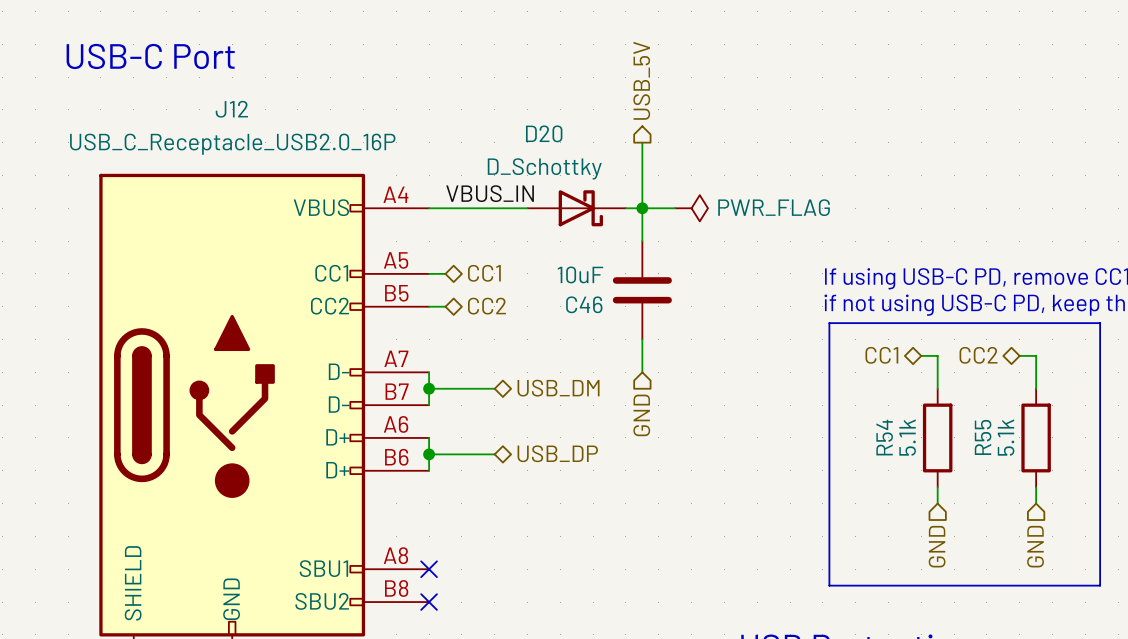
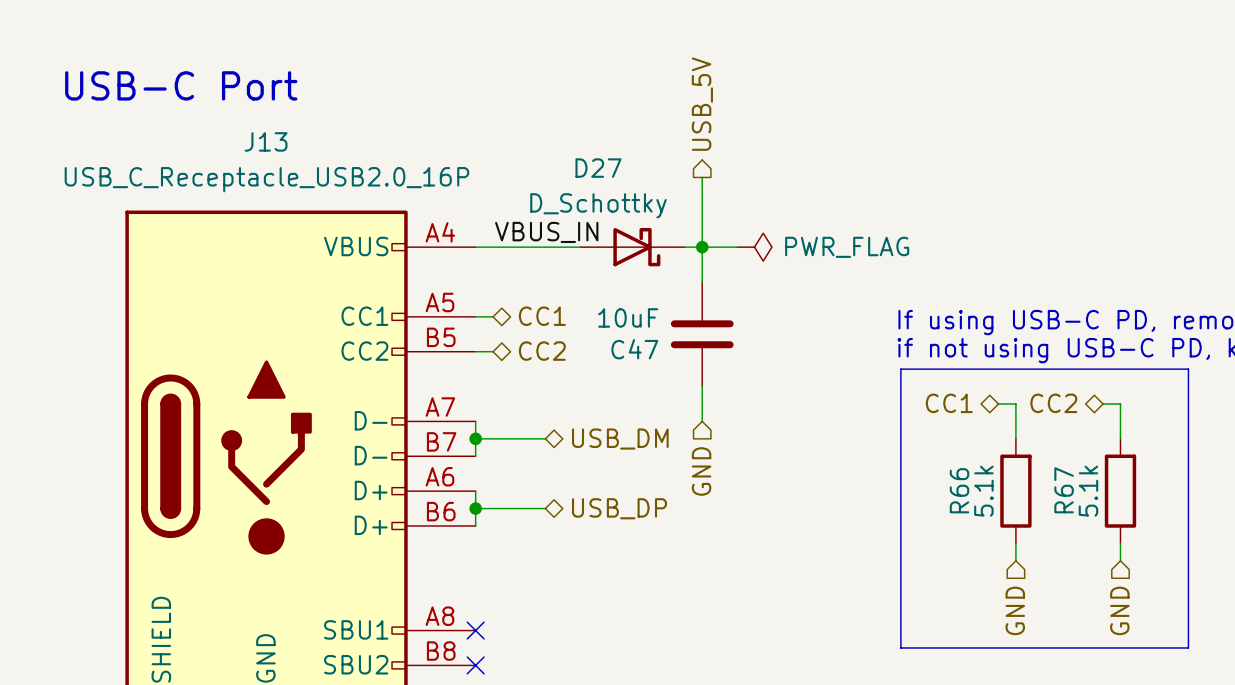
J12 name: J12 (231, 109) -> J13 (266, 141)
D20 name: D20 (544, 133) -> D27 (598, 168)
C46 name: C46 (584, 304) -> C47 (634, 349)
R54 name: R54 (884, 437) -> R66 (959, 490)
R55 name: R55 (983, 437) -> R67 (1064, 490)

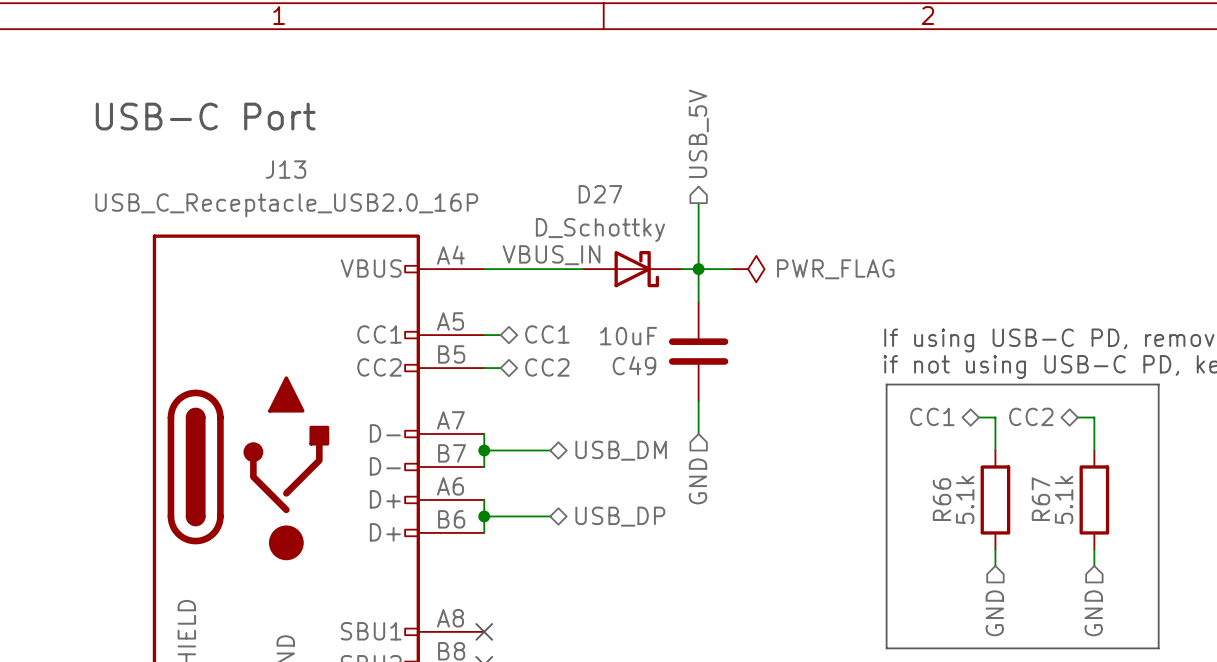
C47 name: C47 (634, 349) -> C49 (634, 365)

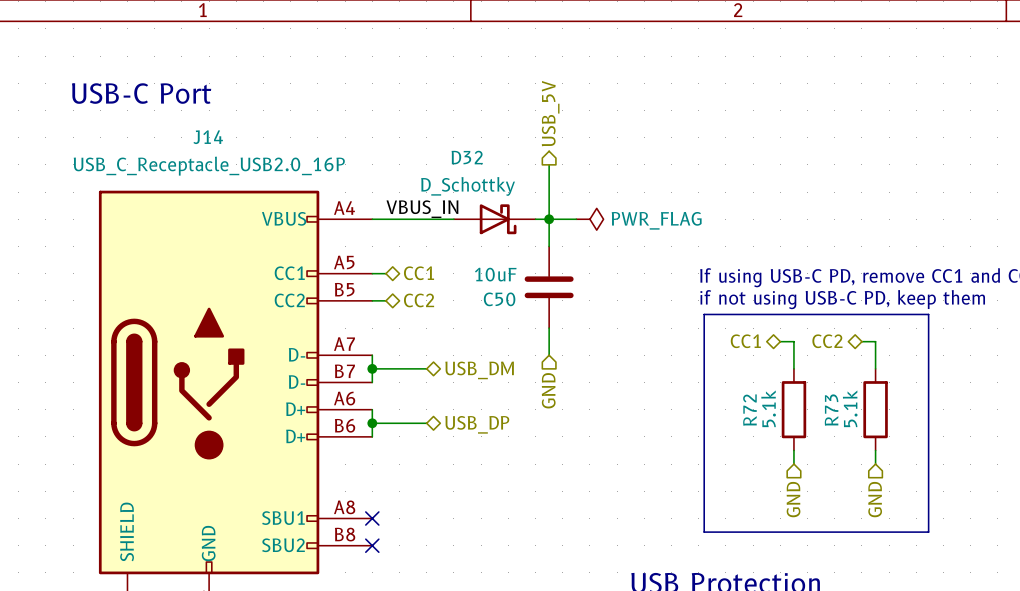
J13 name: J13 (285, 169) -> J14 (208, 137)
D27 name: D27 (600, 194) -> D32 (467, 157)
C49 name: C49 (634, 365) -> C50 (499, 299)
R66 name: R66 (942, 499) -> R72 (749, 410)
R67 name: R67 (1040, 499) -> R73 (831, 410)

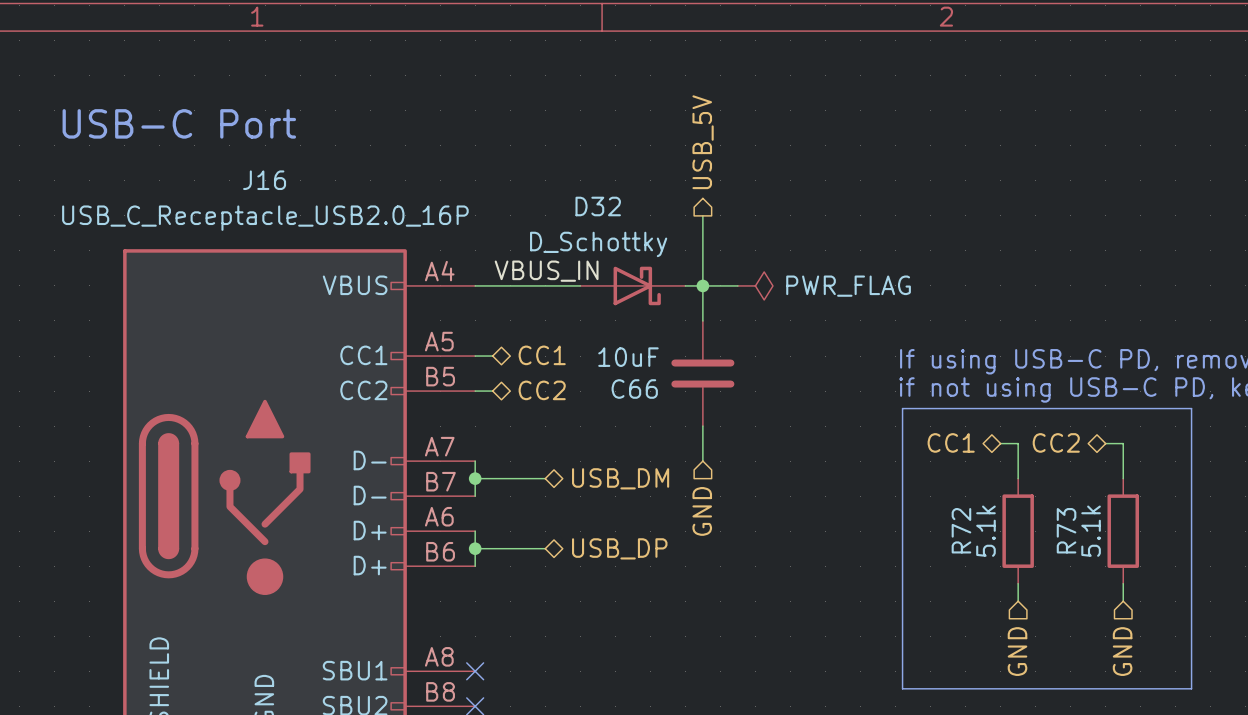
J14 name: J14 (208, 137) -> J16 (264, 180)
C50 name: C50 (499, 299) -> C66 (634, 388)

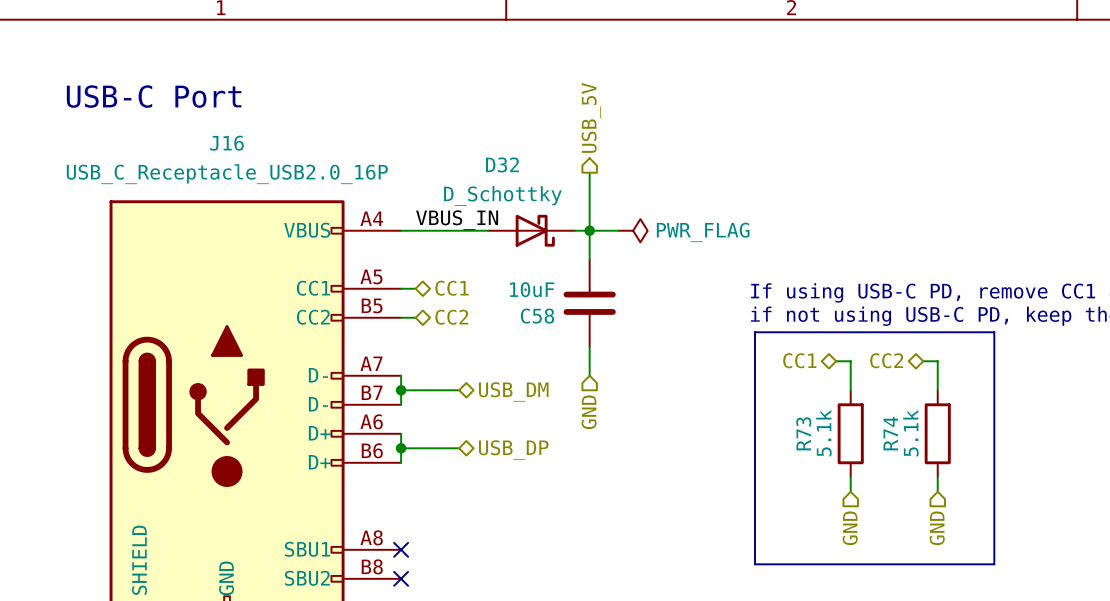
C66 name: C66 (634, 388) -> C58 (537, 316)
R72 name: R72 (961, 530) -> R73 (803, 433)
R73 name: R73 (1066, 530) -> R74 (890, 433)

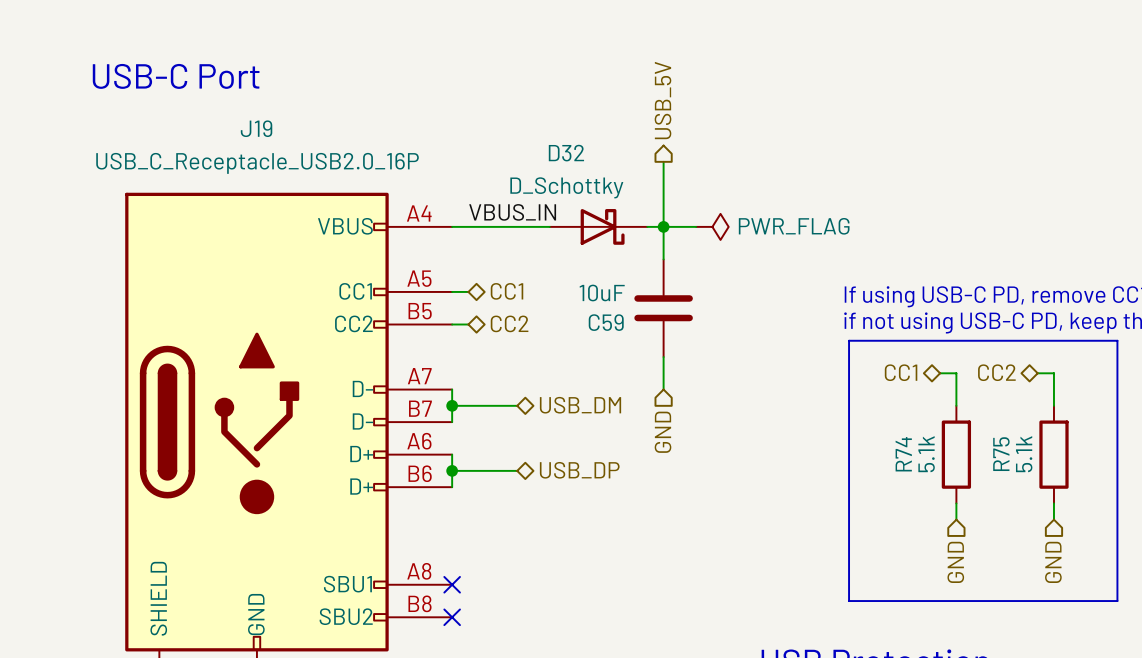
J16 name: J16 (226, 143) -> J19 (256, 128)
C58 name: C58 (537, 316) -> C59 (606, 322)
R73 name: R73 (803, 433) -> R74 (903, 454)
R74 name: R74 (890, 433) -> R75 (1001, 454)

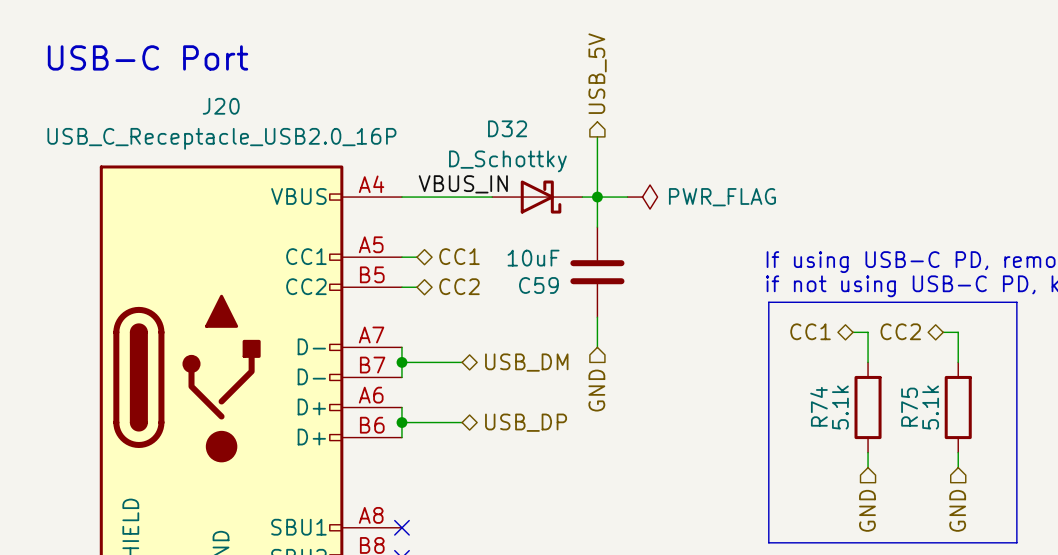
J19 name: J19 (256, 128) -> J20 (221, 106)

